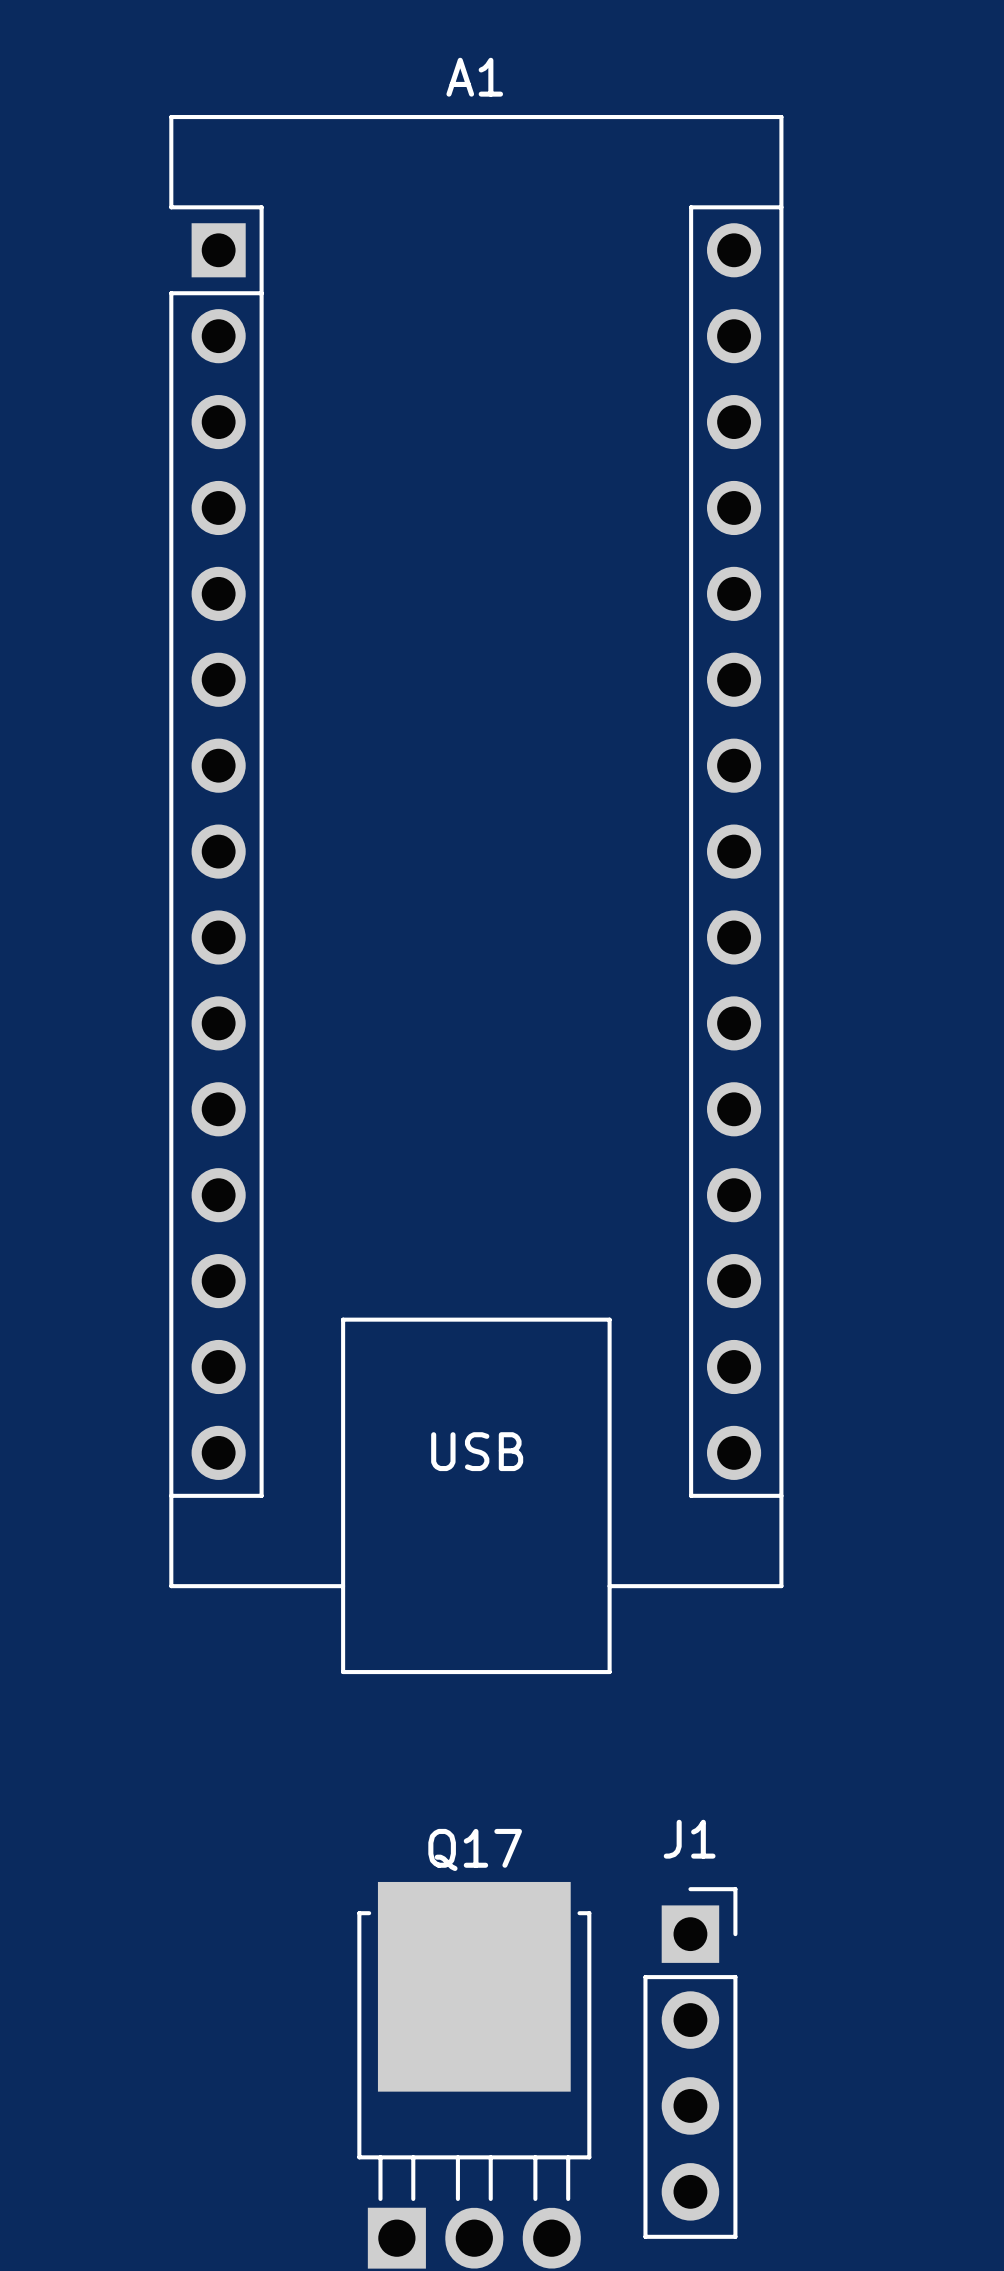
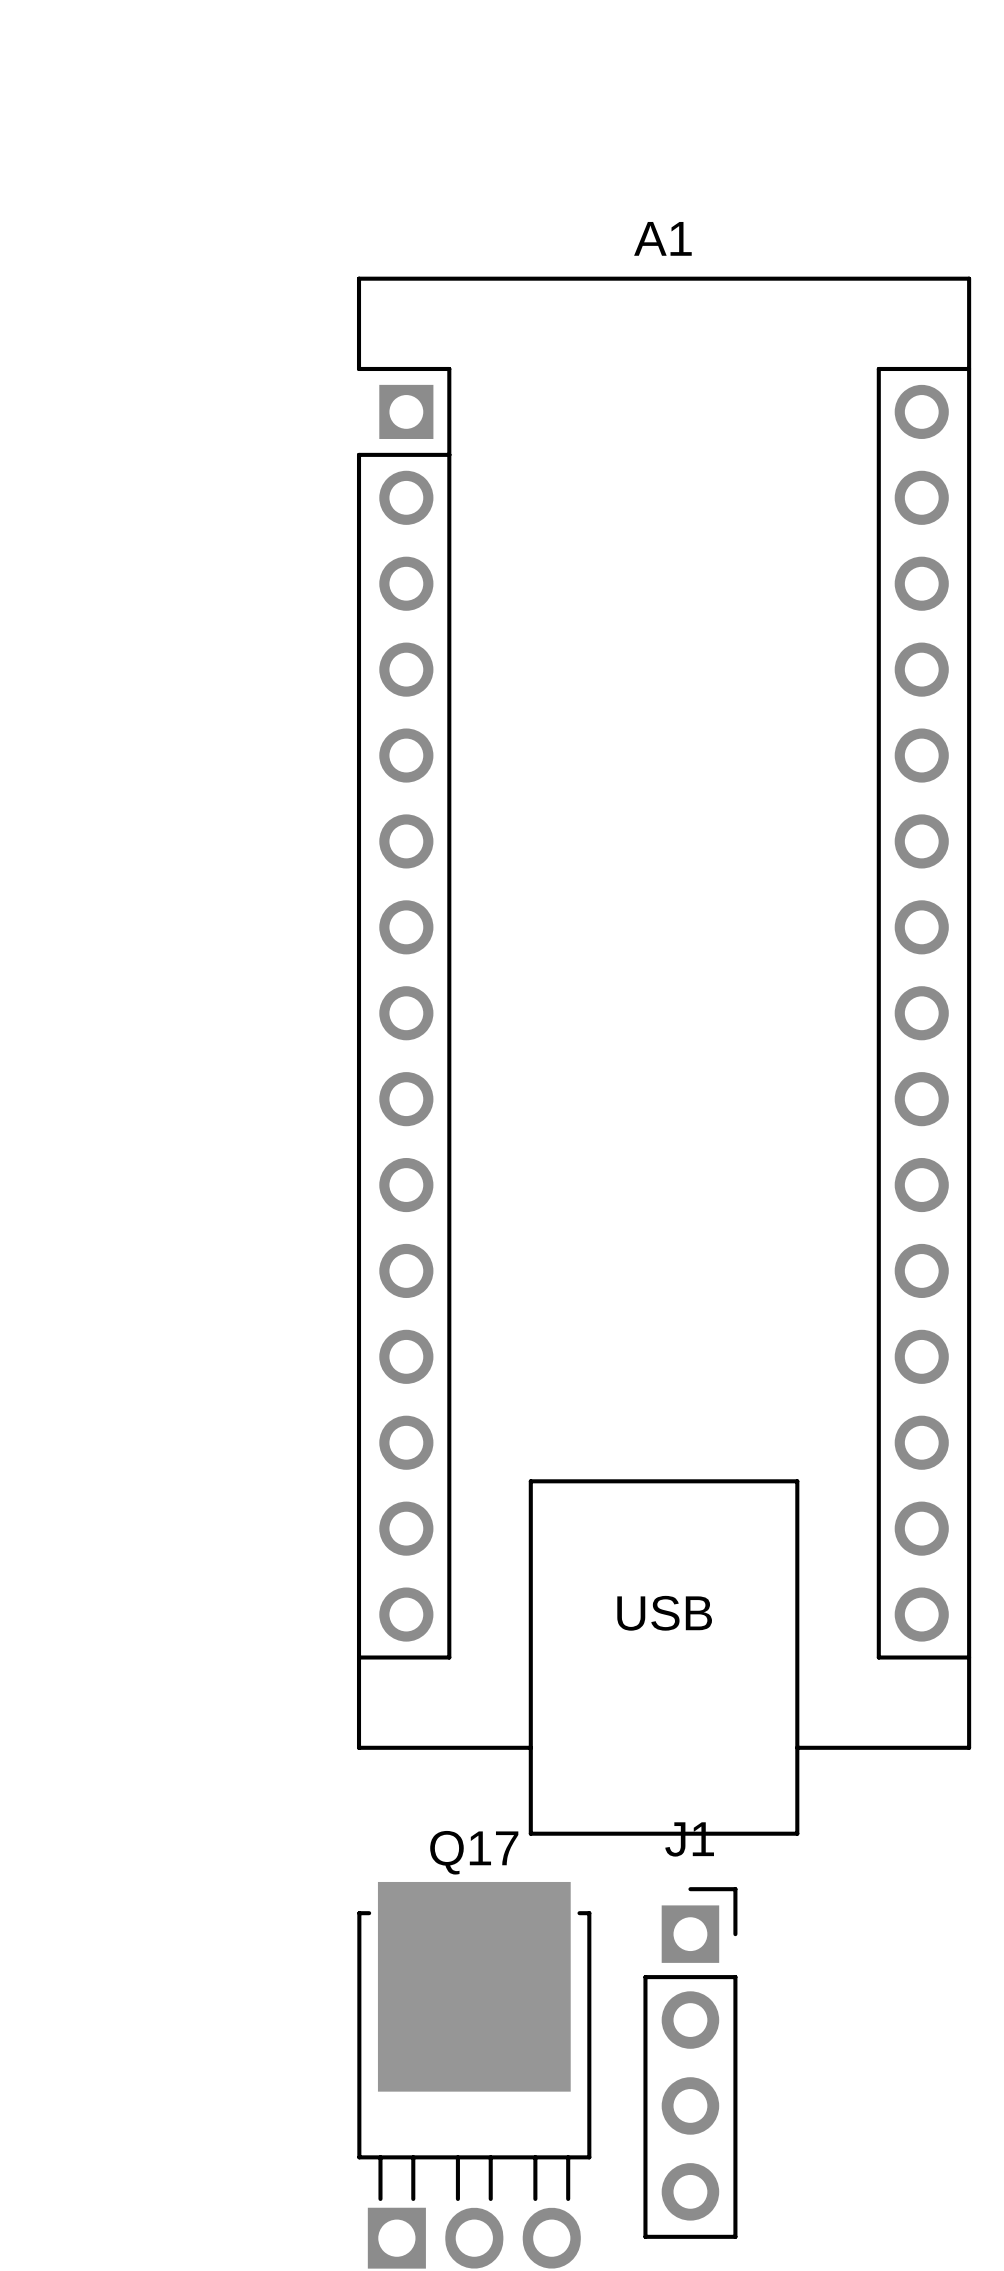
A1 position: (476, 894) -> (664, 1056)

